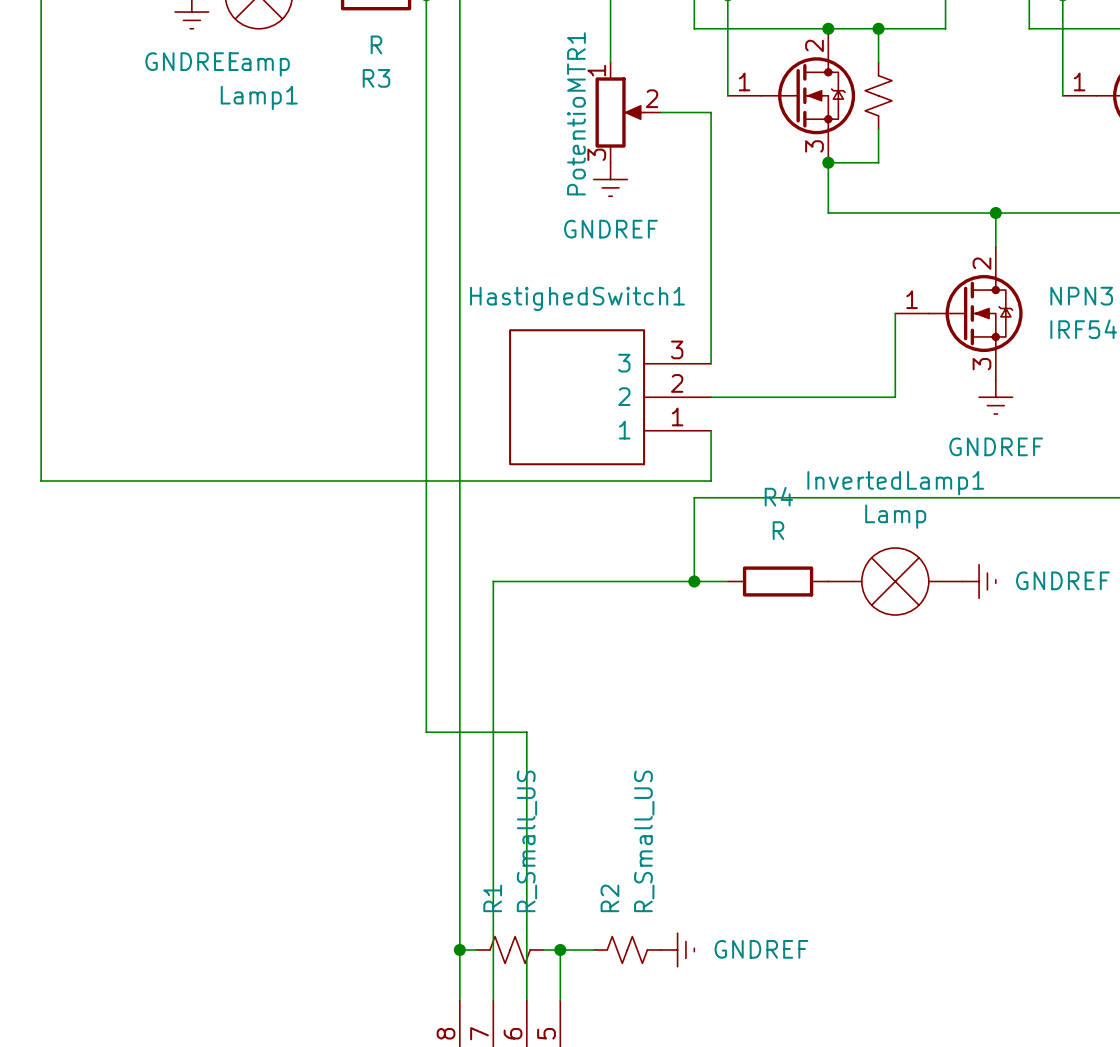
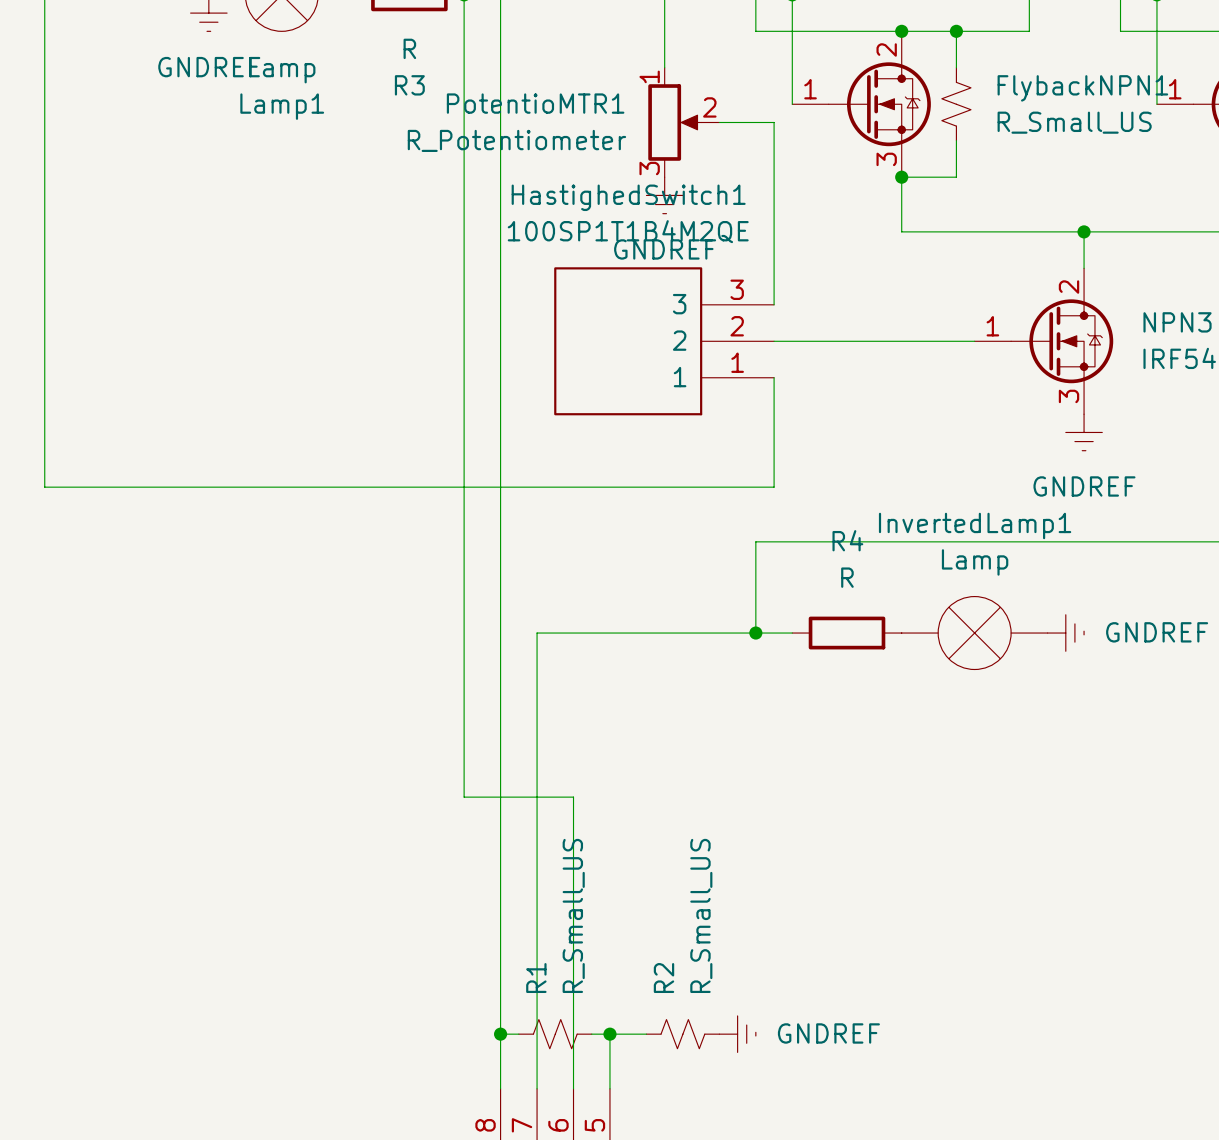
FlybackNPN1 name: none -> FlybackNPN1 (1082, 88)
FlybackNPN1 value: none -> R_Small_US (1074, 122)
PotentioMTR1 name rotation: 0° (576, 113) -> 90° clockwise (535, 103)
PotentioMTR1 value: none -> R_Potentiometer (516, 140)
HastighedSwitch1 value: none -> 100SP1T1B4M2QE (628, 231)
wire: (711, 280) (711, 347) -> (774, 395) (774, 468)
HastighedSwitch1 name position: HastighedSwitch1 (577, 298) -> HastighedSwitch1 (628, 197)
wire: (895, 313) (895, 397) (711, 397) -> (974, 341) (774, 341)
HastighedSwitch1 position: (610, 397) -> (664, 341)
wire: (41, 447) (41, 481) (711, 481) (711, 447) -> (44, 487) (774, 487)

